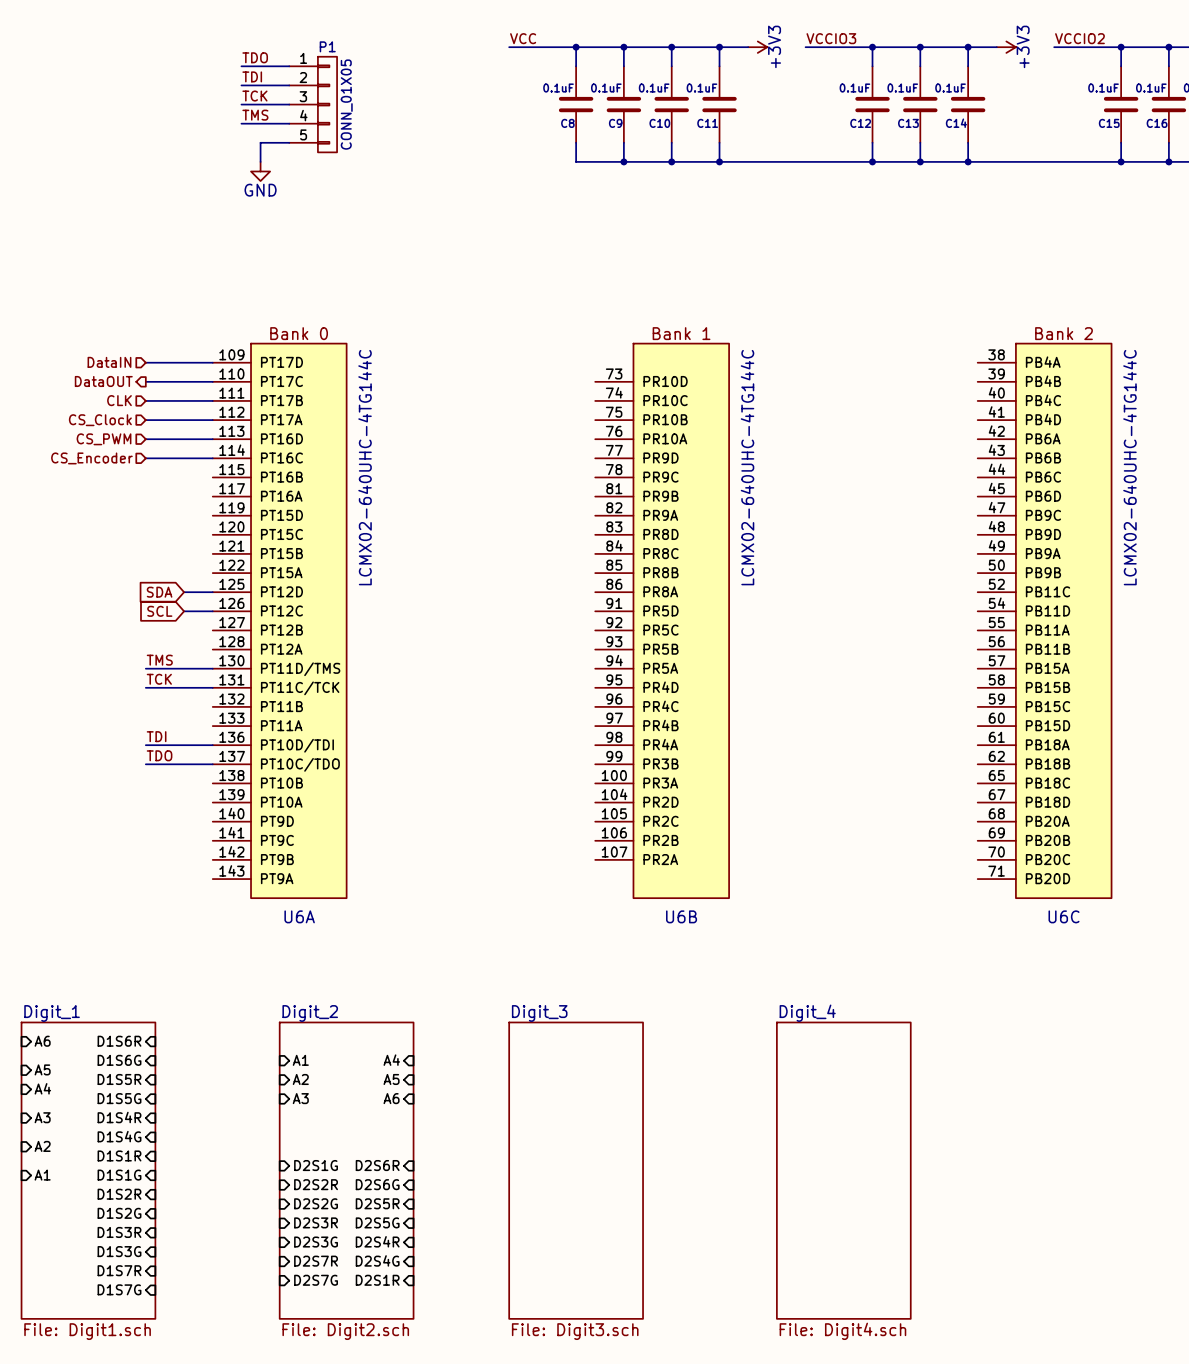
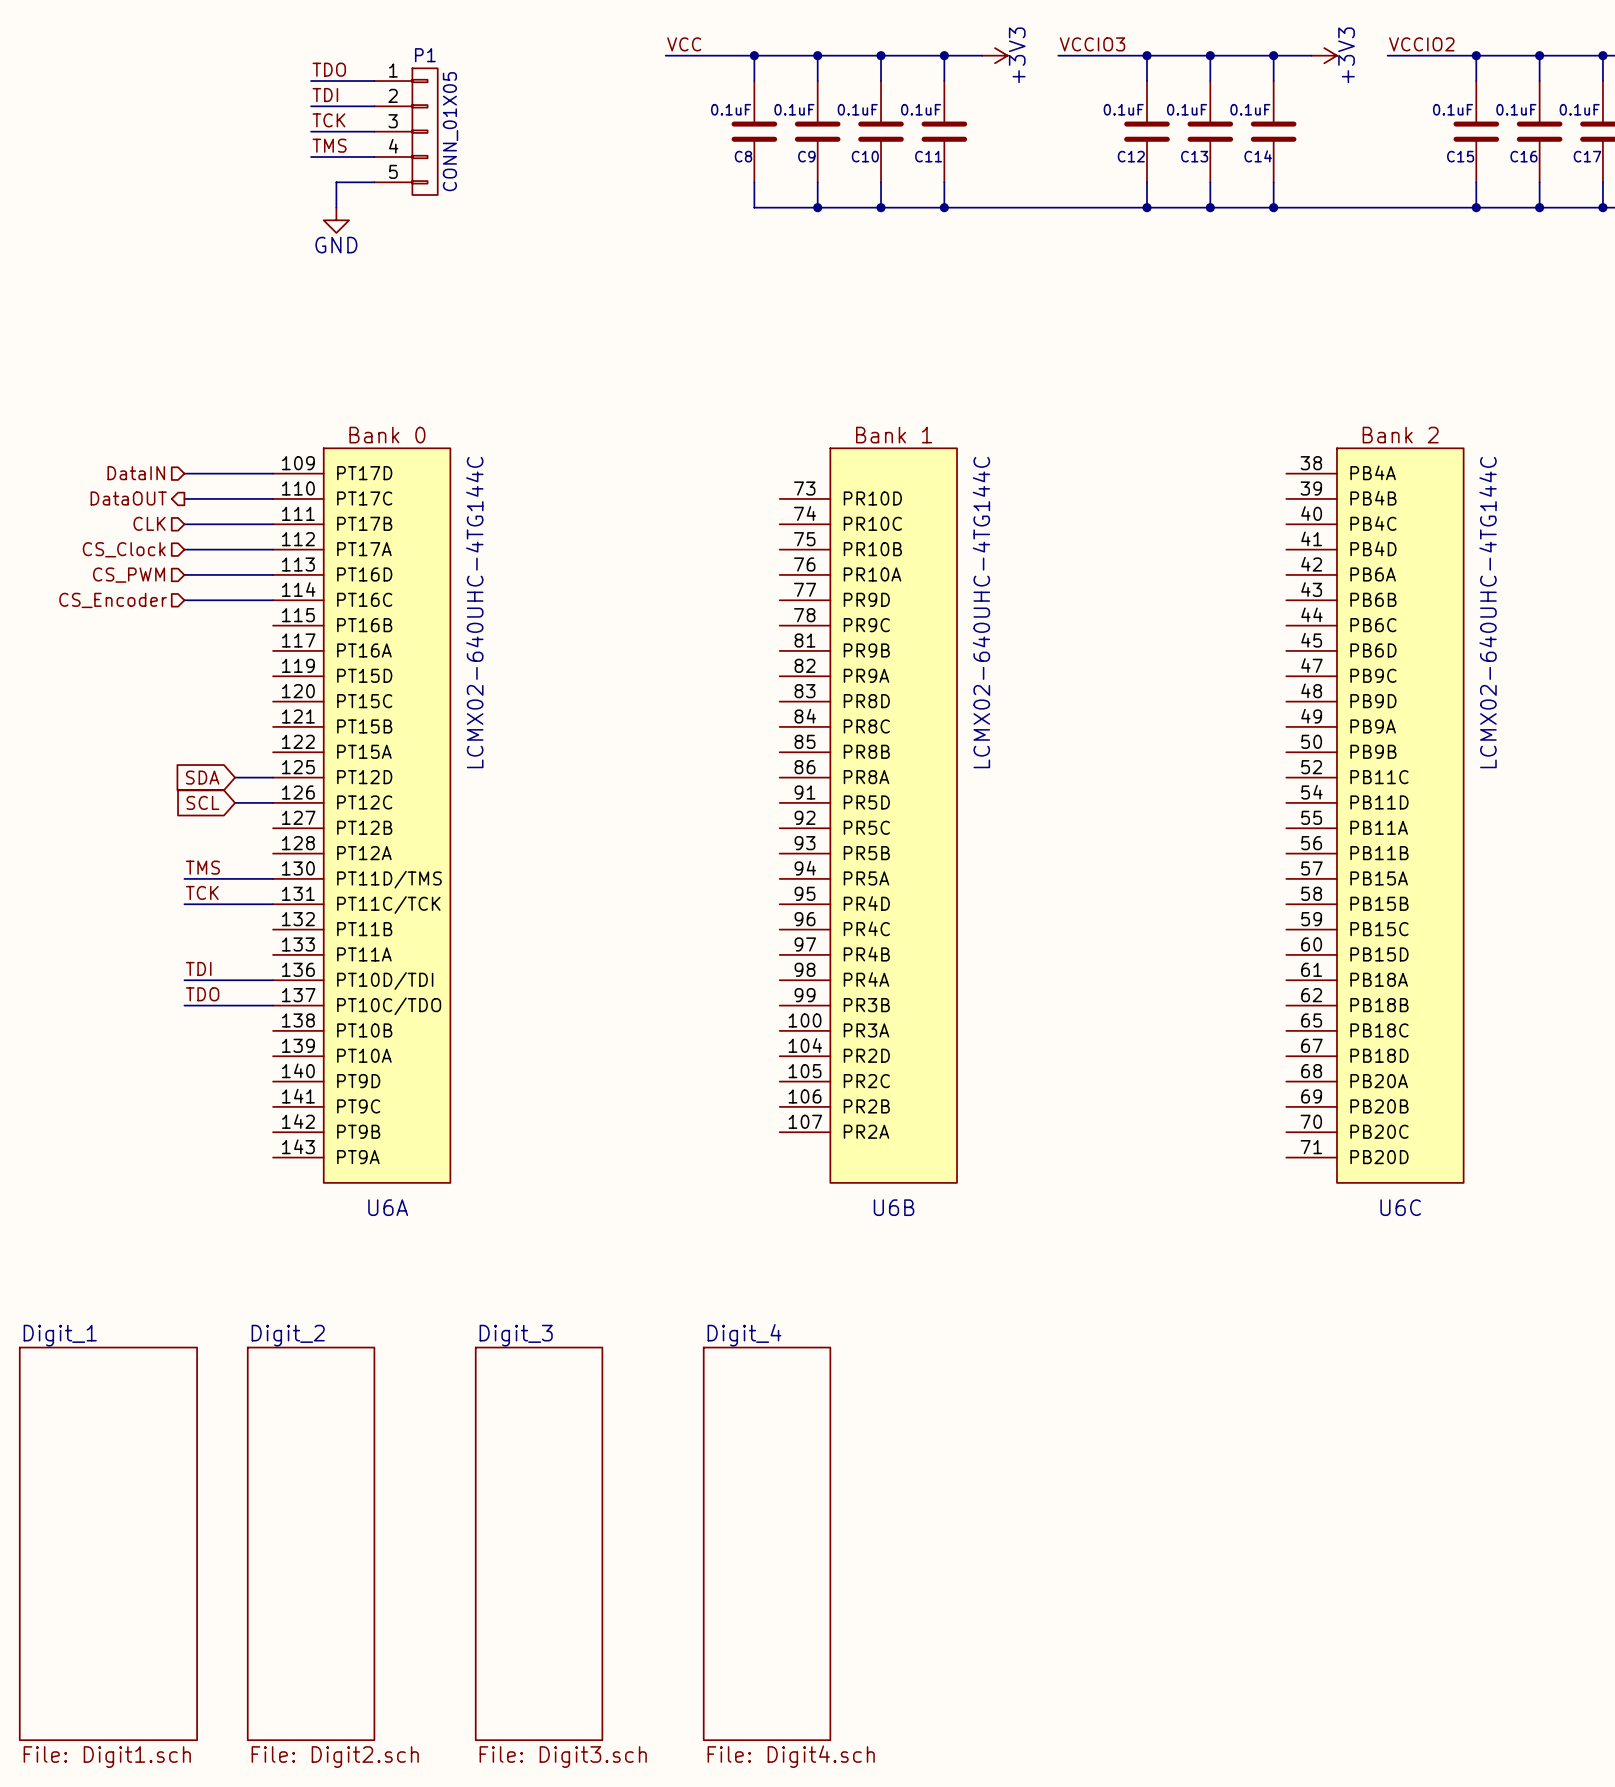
sheet Digit_2 name position: Digit_2 (310, 1013) -> Digit_2 (288, 1335)
sheet Digit_3 name position: Digit_3 (539, 1013) -> Digit_3 (516, 1335)
sheet Digit_4 name position: Digit_4 (807, 1013) -> Digit_4 (744, 1335)
sheet Digit_2 shape: [279, 1022, 414, 1319] -> [247, 1347, 375, 1741]
sheet Digit_3 shape: [509, 1022, 644, 1319] -> [475, 1347, 603, 1741]
sheet Digit_4 shape: [776, 1022, 911, 1319] -> [703, 1347, 831, 1741]
sheet pin: A6 (42, 1041) -> none
sheet pin: D1S6R (119, 1041) -> none
sheet pin: D1S6G (119, 1060) -> none
sheet pin: A1 (300, 1060) -> none
sheet pin: A4 (391, 1060) -> none
sheet pin: A5 (42, 1069) -> none
sheet pin: D1S5R (119, 1079) -> none
sheet pin: A2 (300, 1079) -> none
sheet pin: A5 (391, 1079) -> none
sheet pin: A4 (42, 1088) -> none
sheet pin: D1S5G (119, 1098) -> none
sheet pin: A3 (300, 1098) -> none
sheet pin: A6 (391, 1098) -> none
sheet pin: A3 (42, 1117) -> none
sheet pin: D1S4R (119, 1117) -> none
sheet pin: D1S4G (119, 1136) -> none
sheet pin: A2 (42, 1146) -> none
sheet pin: D1S1R (119, 1155) -> none
sheet pin: D2S1G (316, 1165) -> none
sheet pin: D2S6R (377, 1165) -> none
sheet pin: A1 (42, 1175) -> none
sheet pin: D1S1G (119, 1175) -> none
sheet pin: D2S2R (316, 1184) -> none
sheet pin: D2S6G (377, 1184) -> none
sheet pin: D1S2R (119, 1194) -> none
sheet pin: D2S2G (316, 1203) -> none
sheet pin: D2S5R (377, 1203) -> none
sheet pin: D1S2G (119, 1213) -> none
sheet pin: D2S3R (316, 1222) -> none
sheet pin: D2S5G (377, 1222) -> none
sheet pin: D1S3R (119, 1232) -> none
sheet pin: D2S4R (377, 1241) -> none
sheet pin: D2S3G (316, 1242) -> none
sheet pin: D1S3G (119, 1251) -> none
sheet pin: D2S4G (377, 1260) -> none
sheet pin: D2S7R (316, 1261) -> none
sheet pin: D1S7R (119, 1270) -> none
sheet pin: D2S7G (316, 1280) -> none
sheet pin: D2S1R (377, 1280) -> none
sheet pin: D1S7G (119, 1289) -> none
sheet Digit_2 value position: File: Digit2.sch (345, 1331) -> File: Digit2.sch (335, 1757)
sheet Digit_3 value position: File: Digit3.sch (575, 1331) -> File: Digit3.sch (563, 1757)
sheet Digit_4 value position: File: Digit4.sch (842, 1331) -> File: Digit4.sch (791, 1756)

